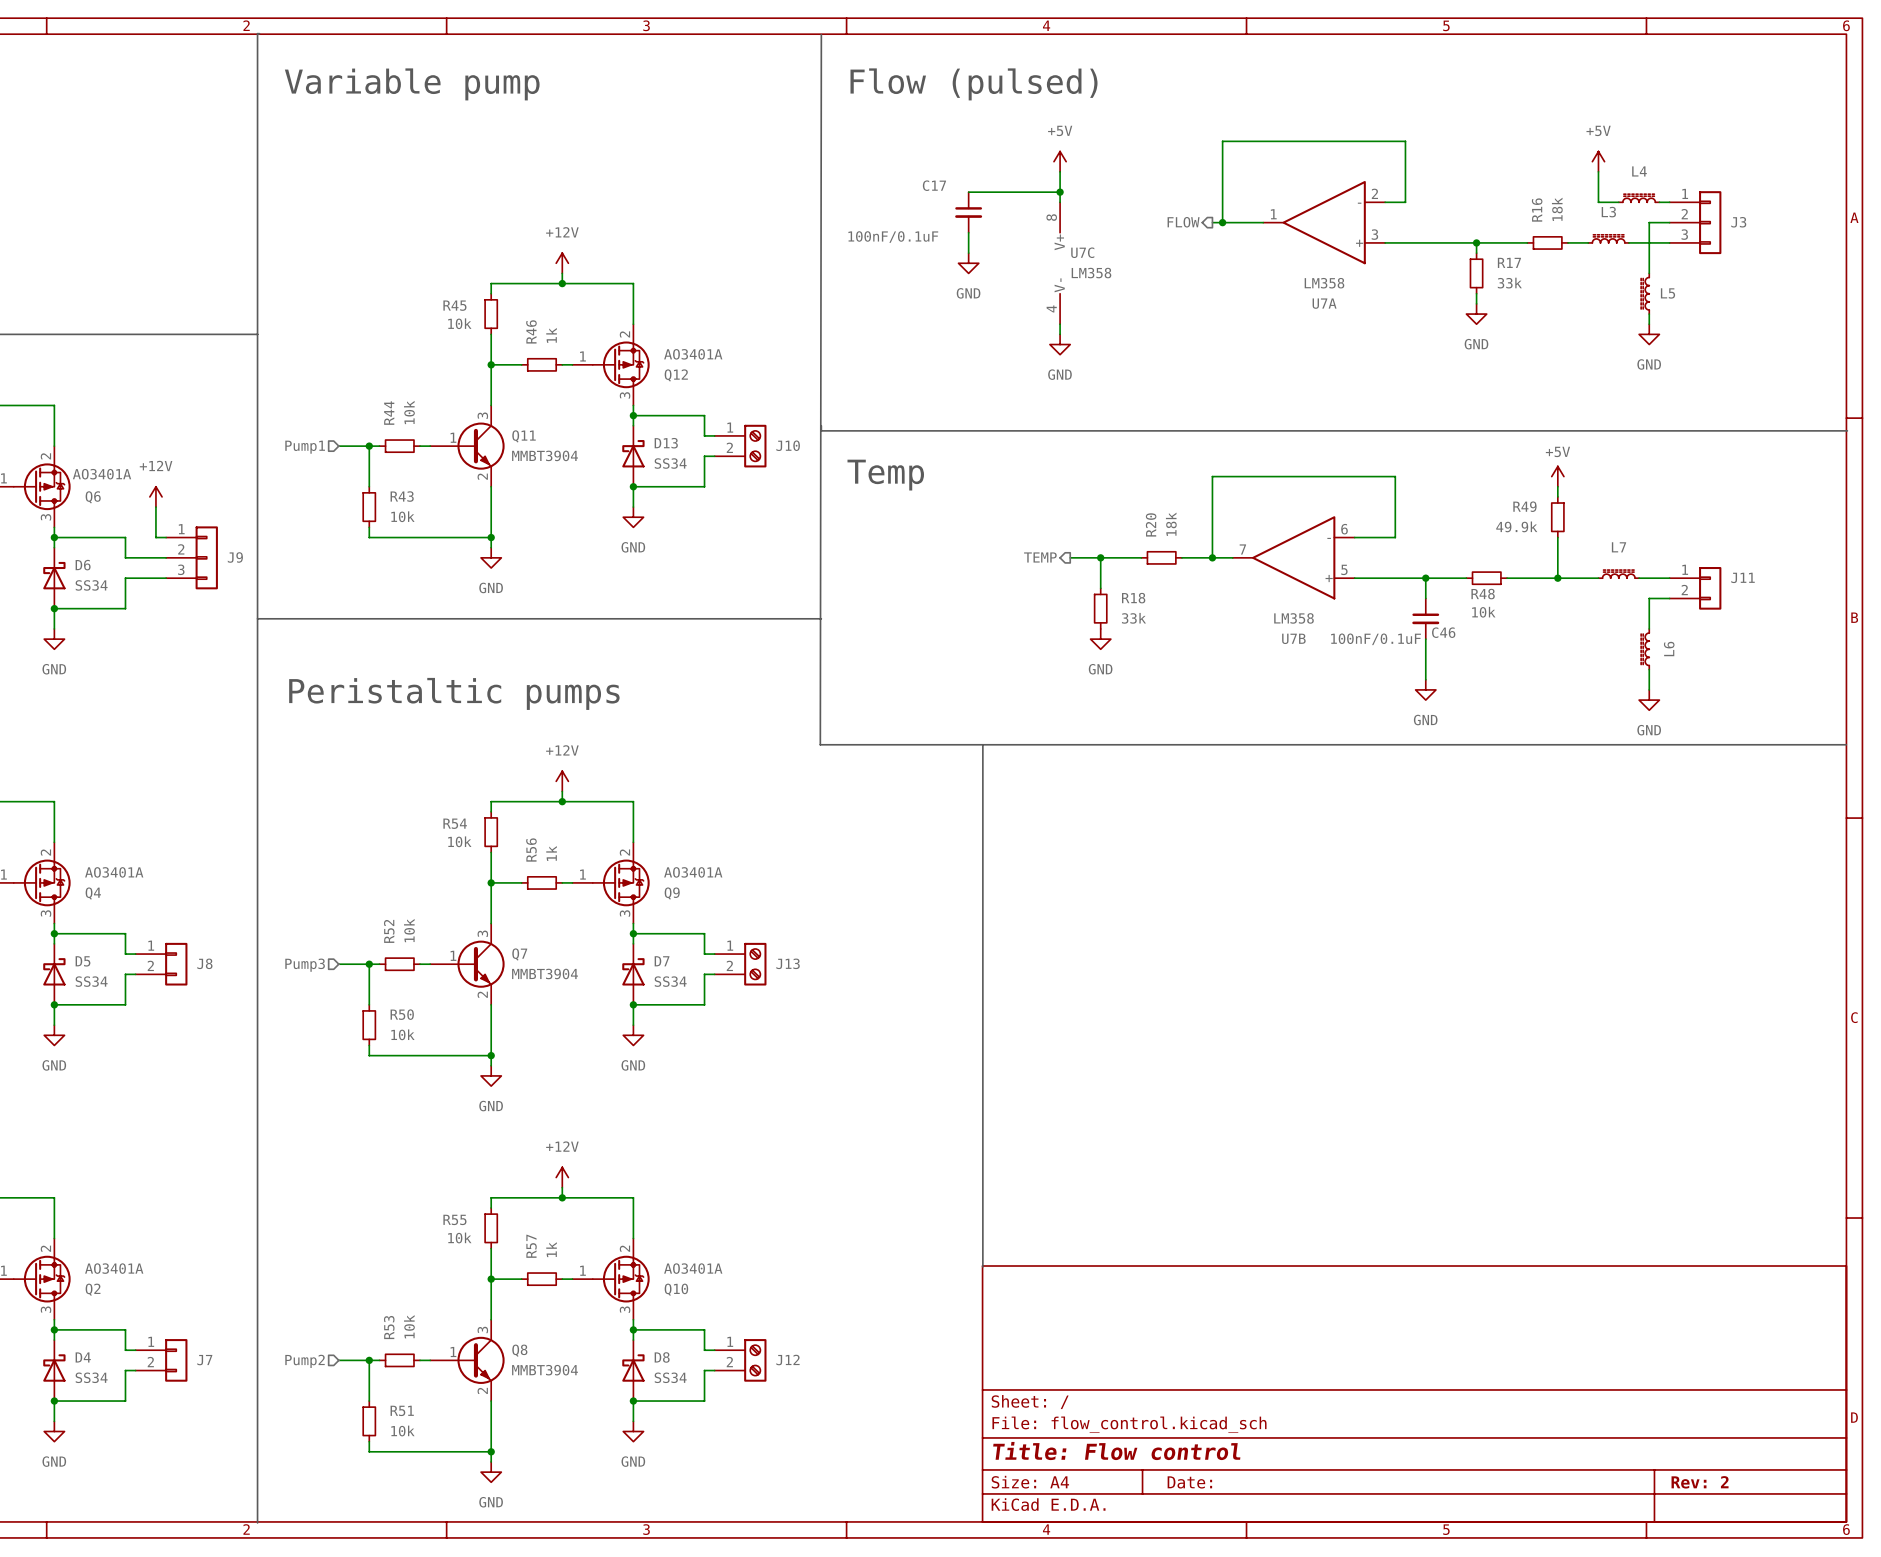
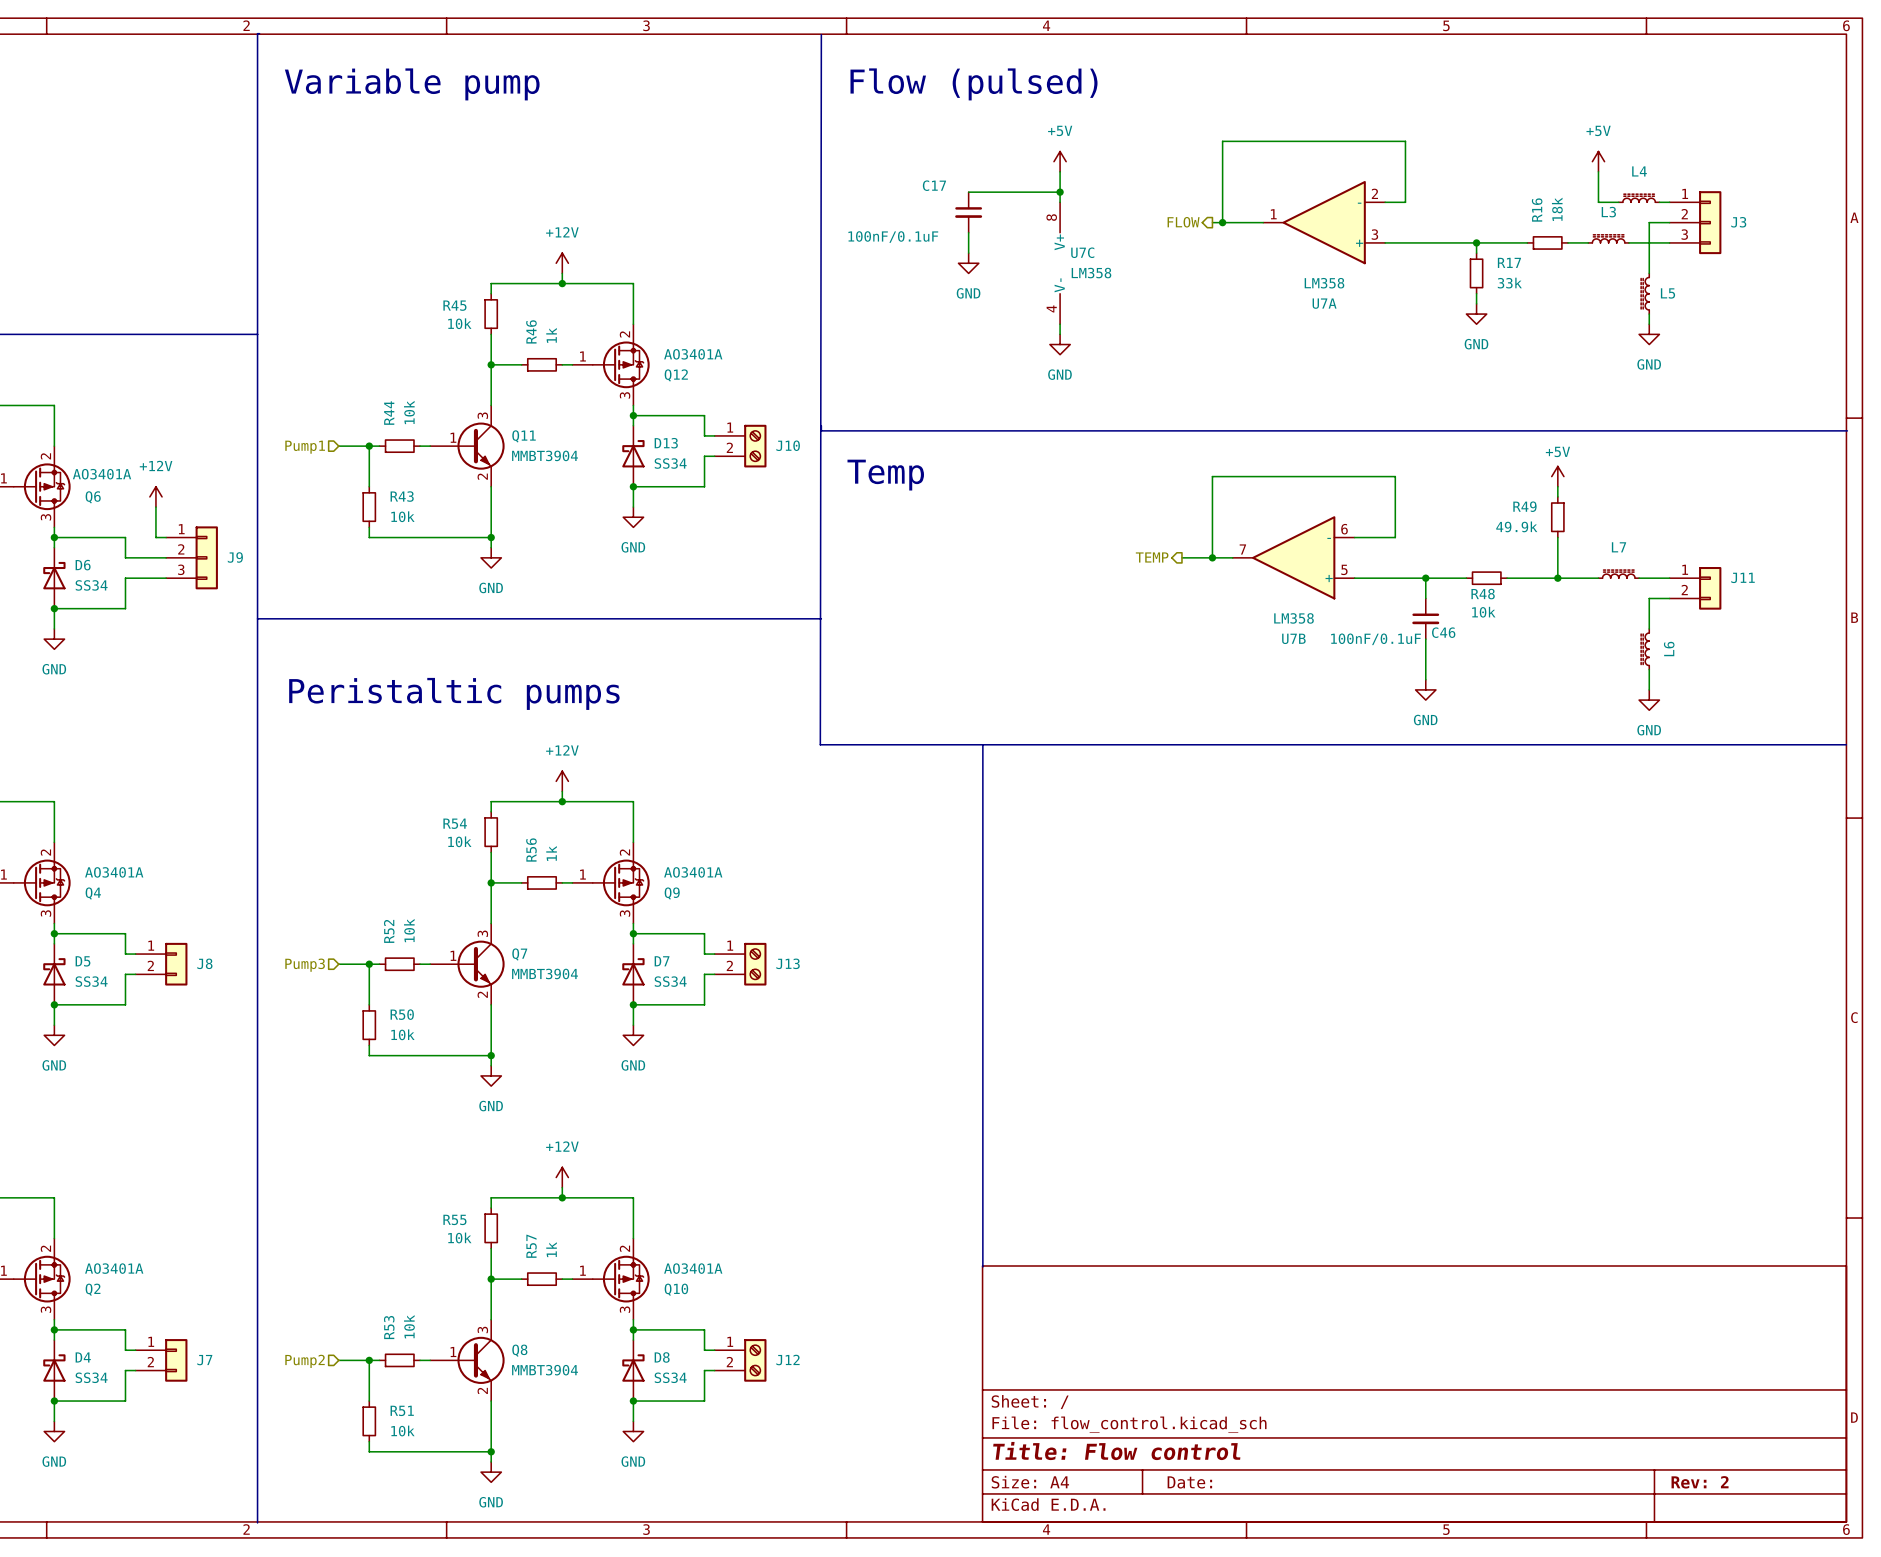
hierarchical label position: TEMP (1040, 557) -> TEMP (1152, 557)
wire: (1070, 557) (1141, 557) -> none
wire: (1100, 557) (1100, 588) -> none
junction: (1100, 557) -> none
R20: 18k (1161, 557) -> none
R18: 33k (1100, 608) -> none
power symbol: GND (1100, 639) -> none

